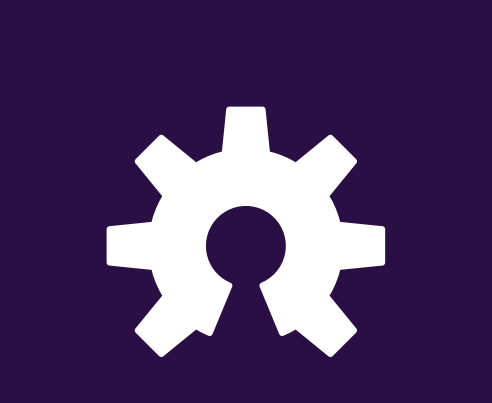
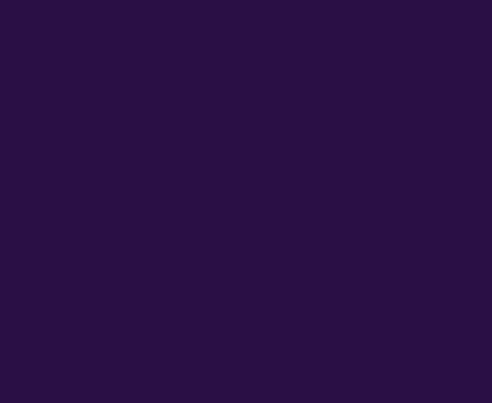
drawing: [106, 106, 386, 358] -> none

